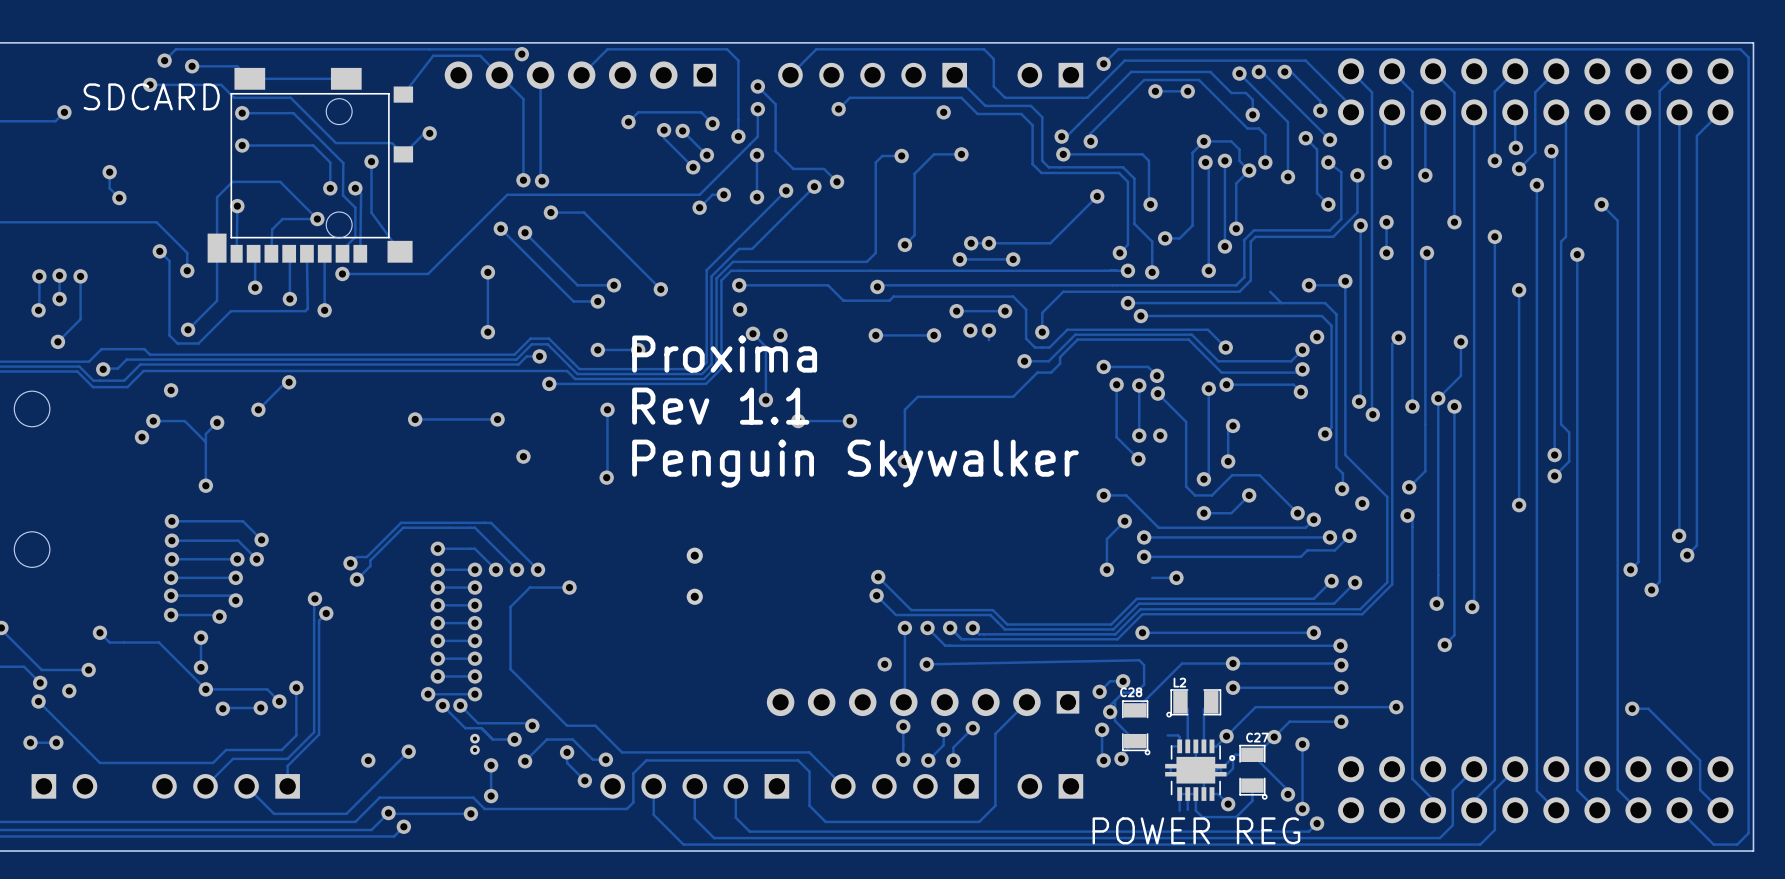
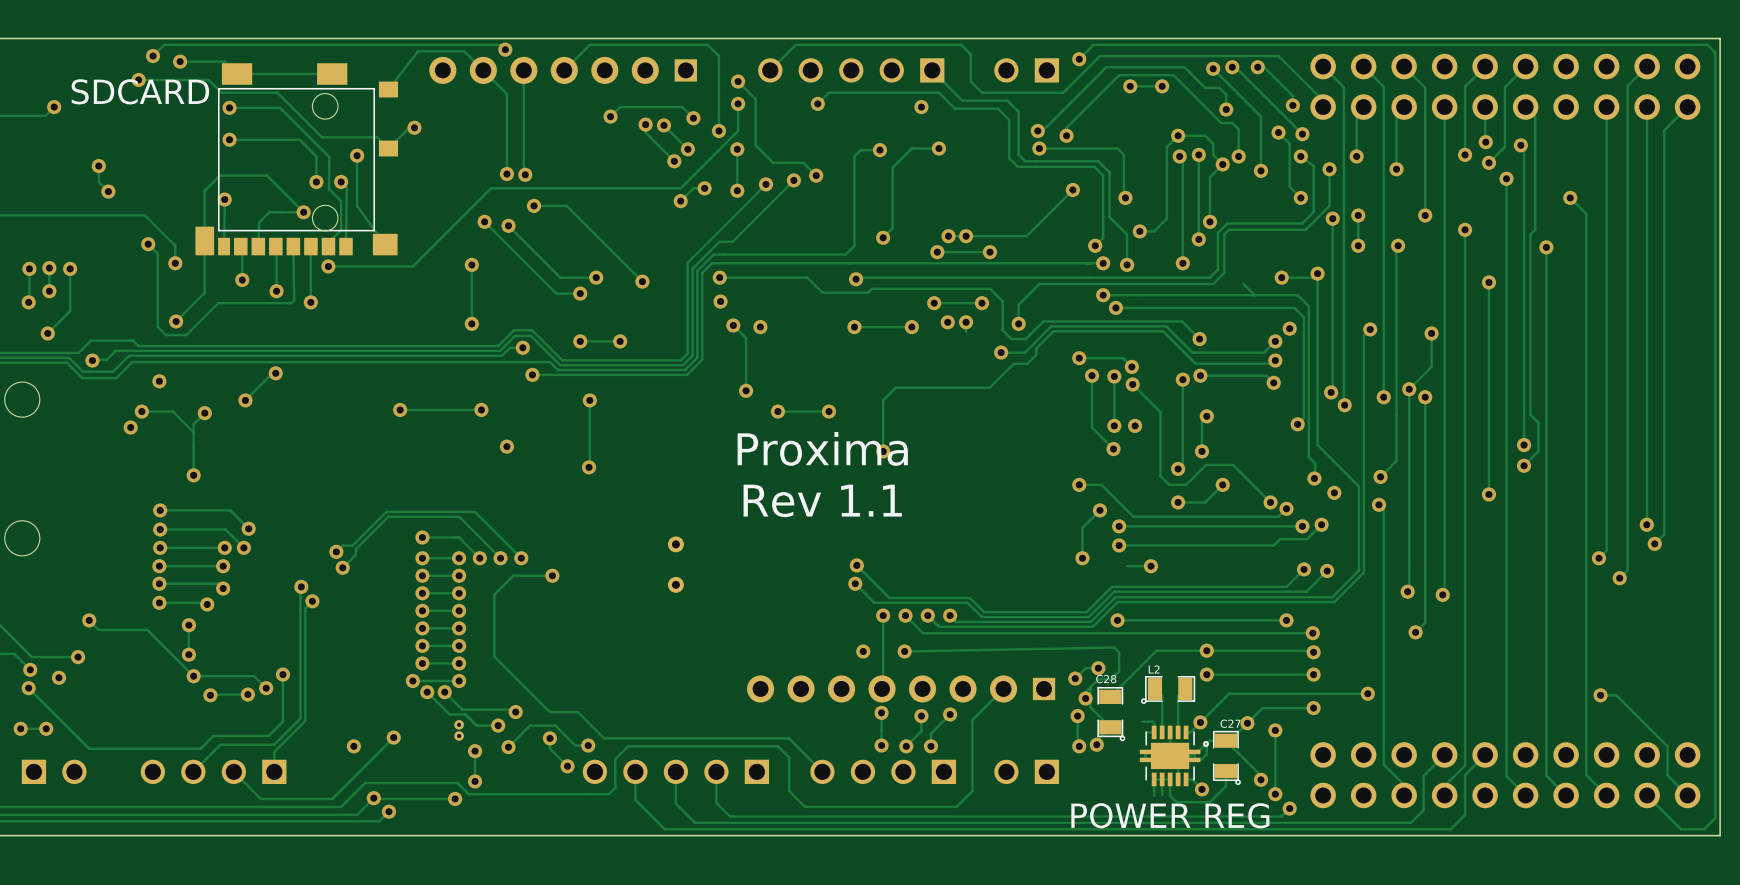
text position: Proxima (724, 354) -> Proxima (822, 448)
text position: Rev 1.1 (720, 406) -> Rev 1.1 (822, 500)
text: Penguin Skywalker (855, 463) -> none

